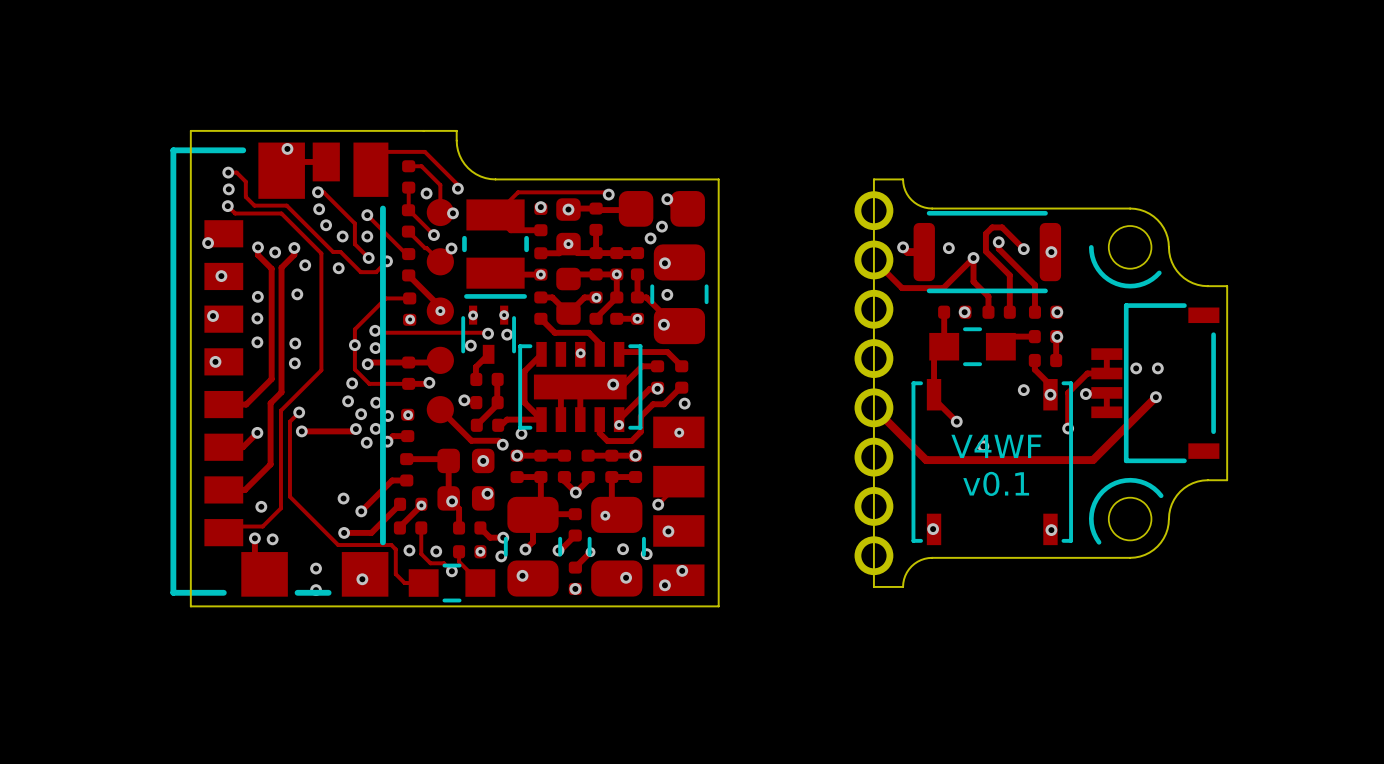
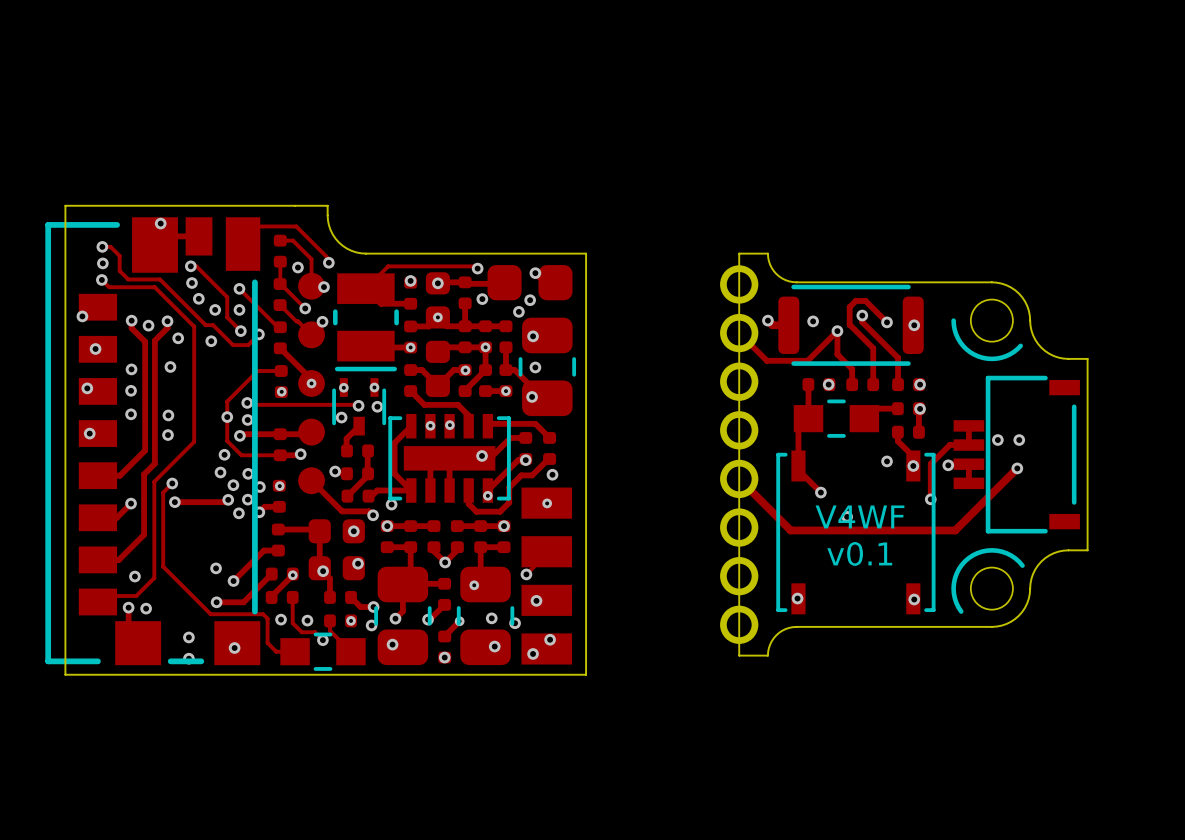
via: none -> (482, 299)
via: none -> (430, 425)

